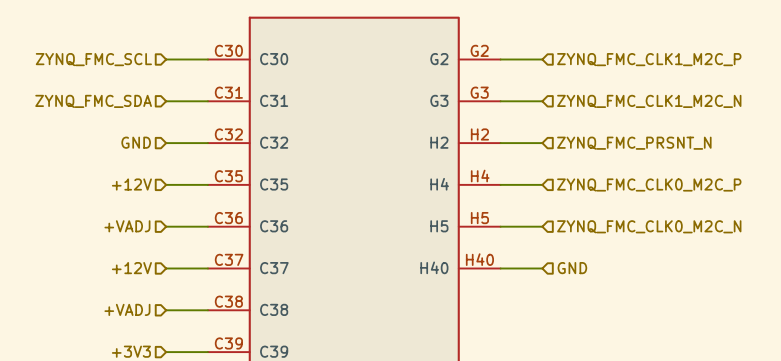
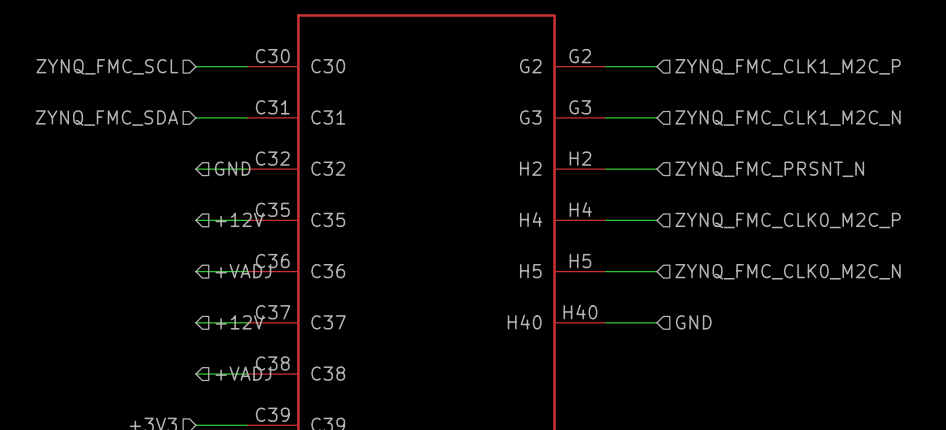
hierarchical label rotation: 0° (136, 142) -> 180° (232, 168)
hierarchical label position: GND (136, 142) -> GND (232, 168)
hierarchical label rotation: 0° (131, 184) -> 180° (239, 219)
hierarchical label position: +12V (131, 184) -> +12V (239, 219)
hierarchical label rotation: 0° (127, 226) -> 180° (243, 271)
hierarchical label position: +VADJ (127, 226) -> +VADJ (243, 271)
hierarchical label rotation: 0° (131, 268) -> 180° (239, 322)
hierarchical label position: +12V (131, 268) -> +12V (239, 322)
hierarchical label rotation: 0° (127, 309) -> 180° (243, 373)
hierarchical label position: +VADJ (127, 309) -> +VADJ (243, 373)

